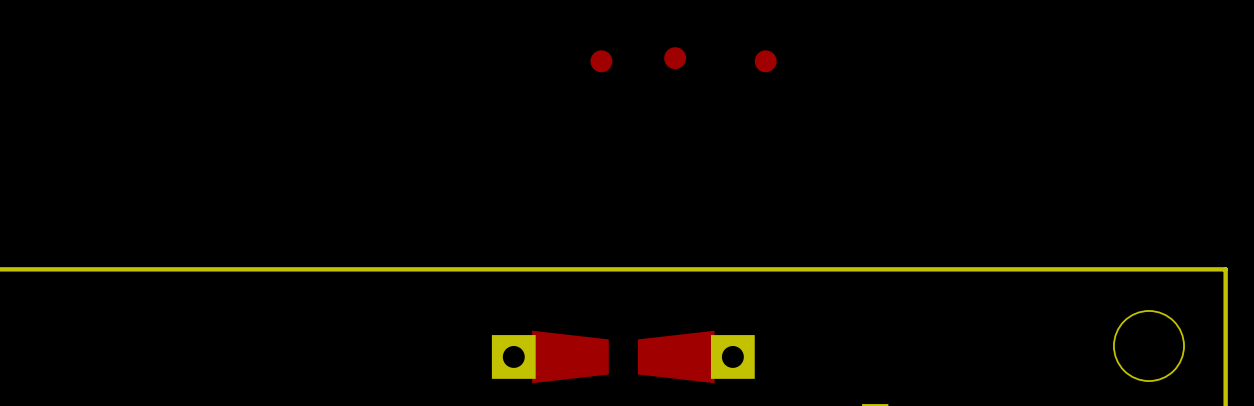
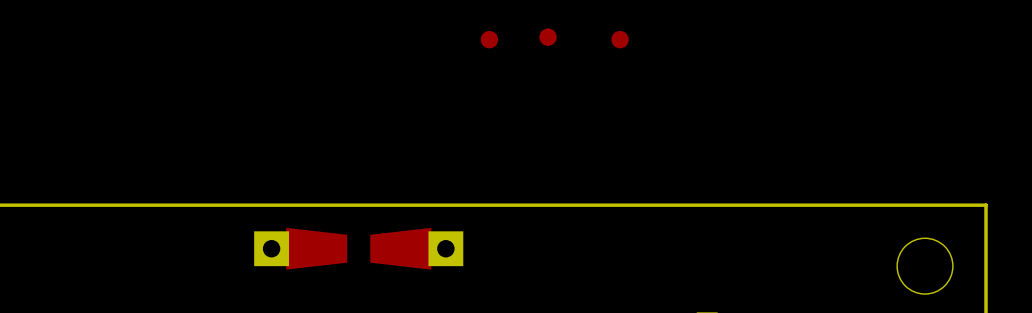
part position: (623, 356) -> (358, 248)

